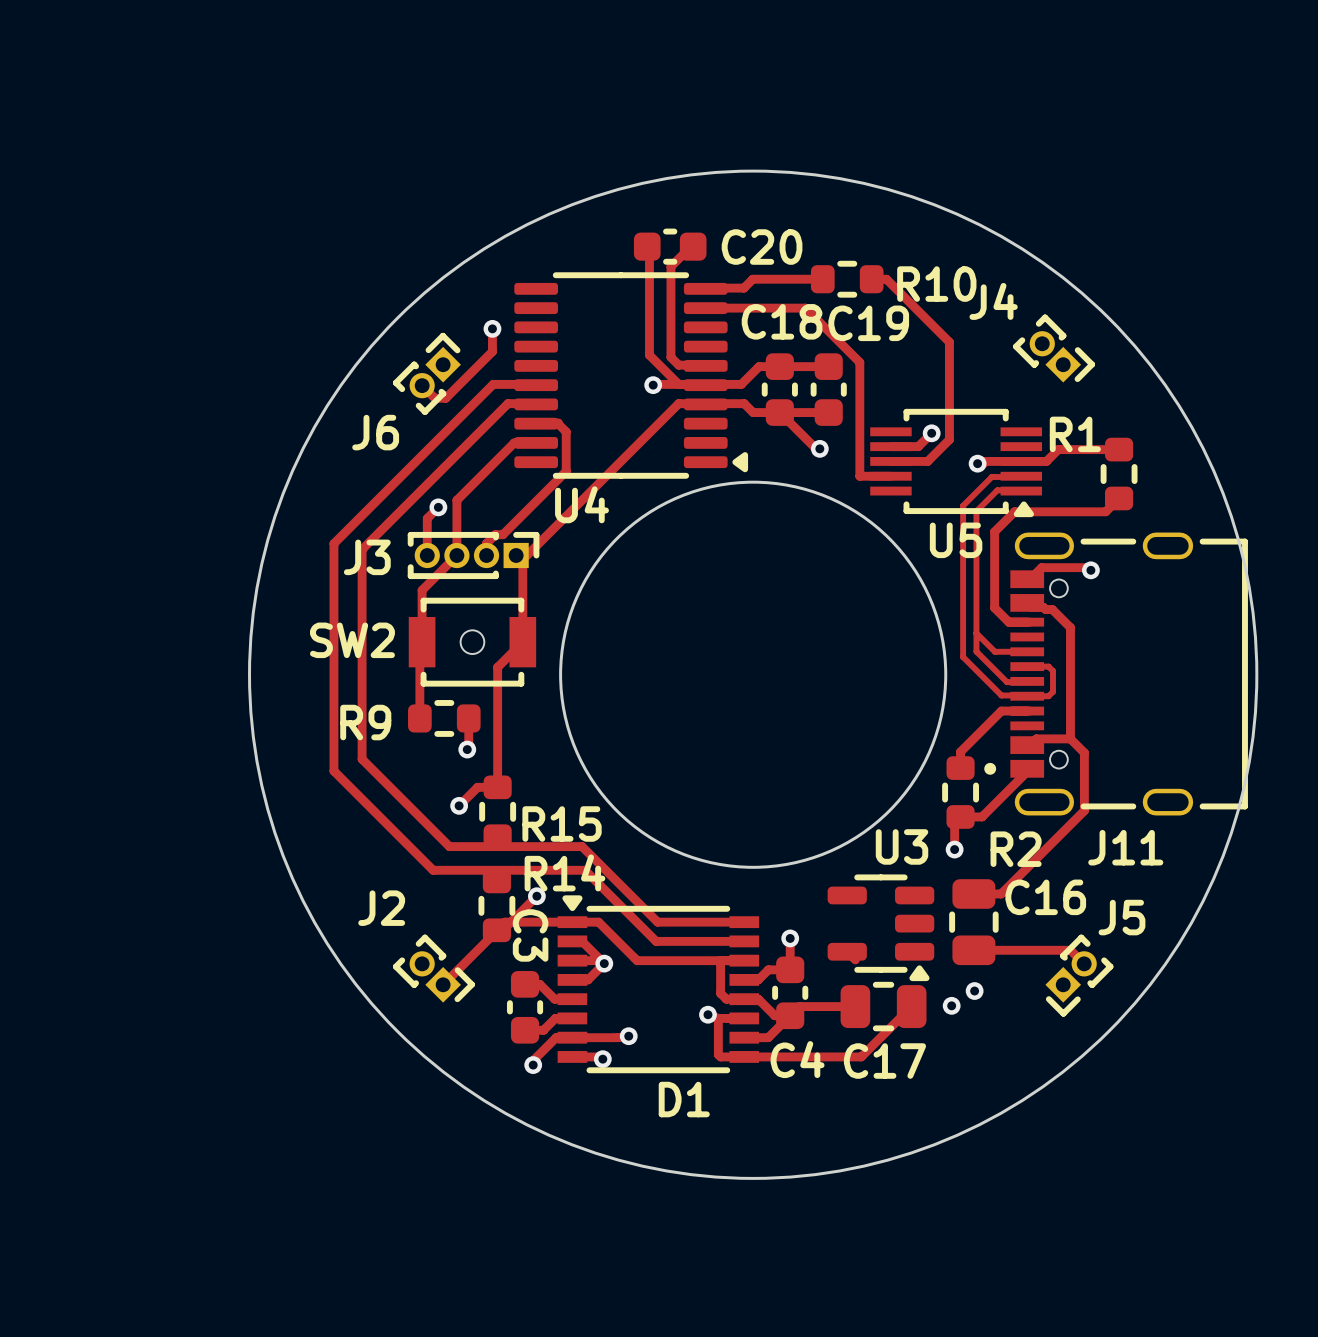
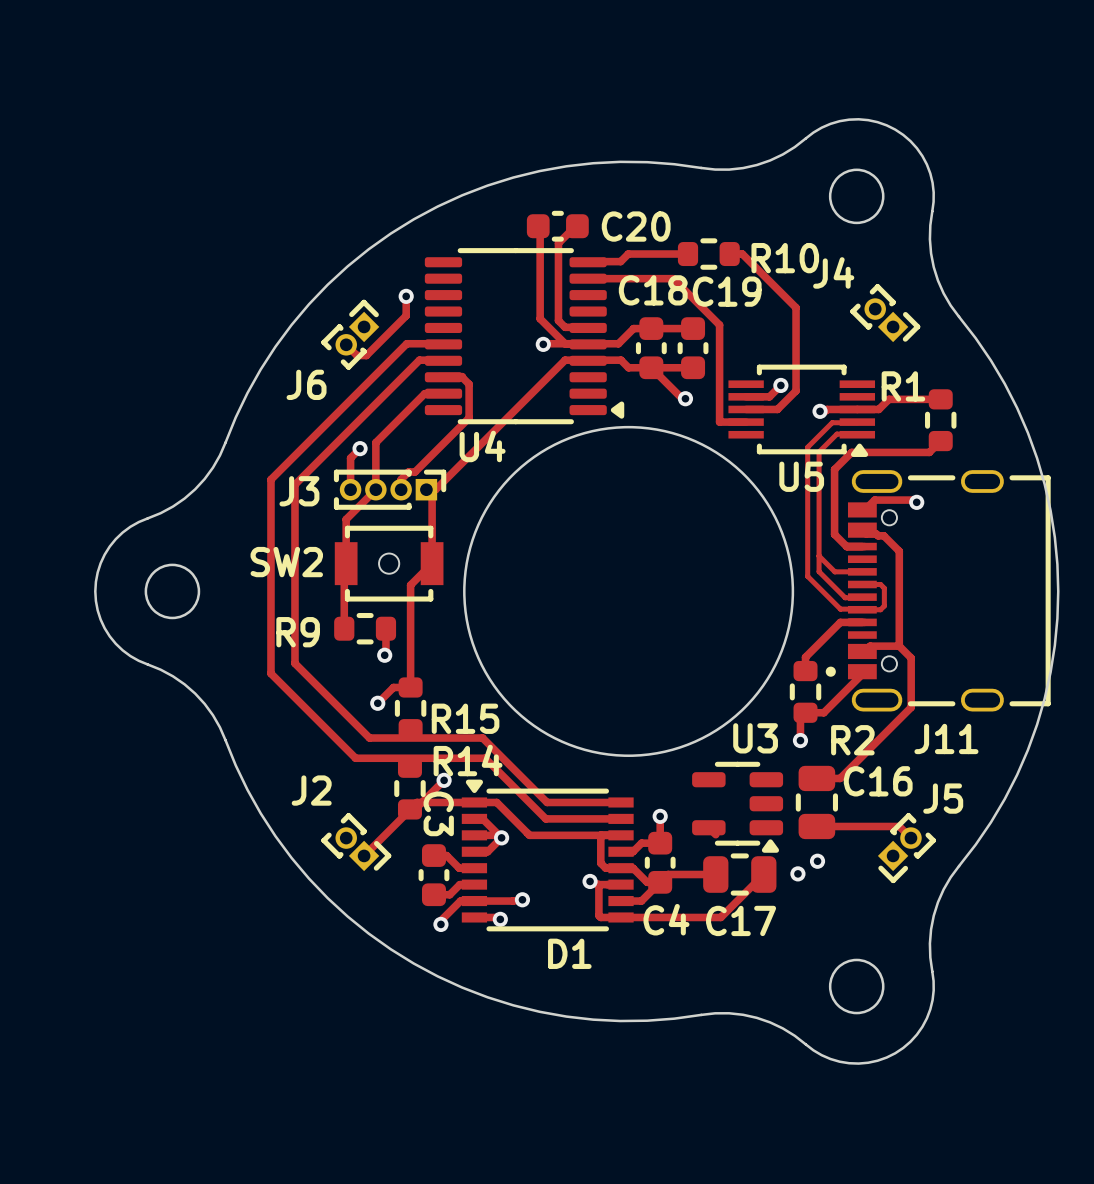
board edge: none -> (805, 138) (782, 154) (756, 165) (743, 168) (715, 169) (674, 164) (620, 161) (566, 166) (539, 171) (487, 185) (462, 195) (437, 206) (390, 233) (368, 249) (327, 284) (291, 324) (260, 369) (235, 417) (219, 455) (204, 478) (184, 498) (173, 506) (130, 526) (115, 539) (100, 563) (95, 591) (100, 619) (115, 643) (130, 656) (173, 676) (195, 693) (204, 703) (219, 727) (235, 765) (260, 813) (275, 836) (309, 878) (327, 898) (368, 933) (413, 963) (462, 987) (487, 997) (539, 1011) (566, 1016) (593, 1019) (647, 1020) (729, 1013) (756, 1017) (782, 1028) (821, 1055) (839, 1061) (858, 1063) (886, 1057) (903, 1047) (916, 1034) (926, 1018) (933, 990) (930, 957) (931, 929) (937, 902) (950, 877) (975, 844) (1004, 799) (1027, 750) (1044, 698) (1050, 672) (1057, 618) (1057, 564) (1050, 510) (1044, 484) (1027, 432) (1004, 383) (975, 338) (950, 305) (937, 280) (931, 253) (929, 239) (933, 201) (932, 182) (922, 156) (903, 134) (886, 125) (868, 120) (849, 119) (830, 123) (805, 138)
round board edge: [248, 169, 1259, 1180] -> none
round board edge: none -> [828, 168, 885, 225]
round board edge: none -> [144, 563, 201, 620]
round board edge: none -> [828, 958, 885, 1015]

